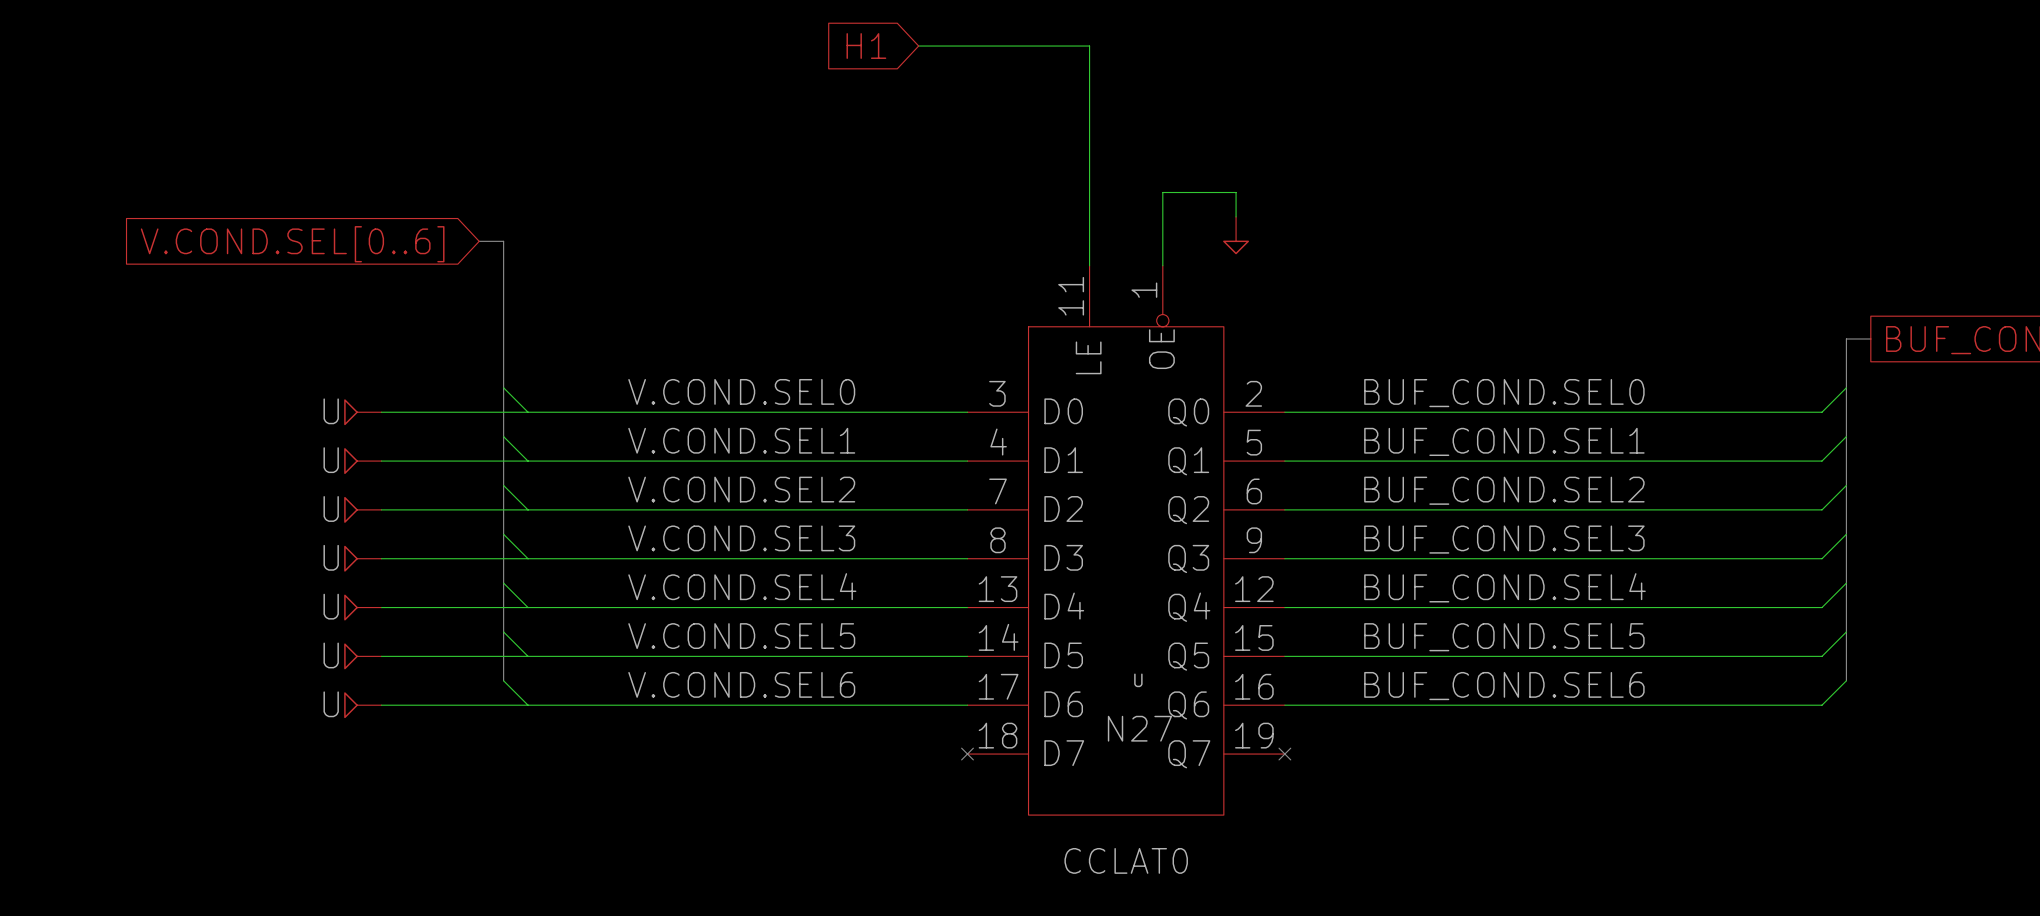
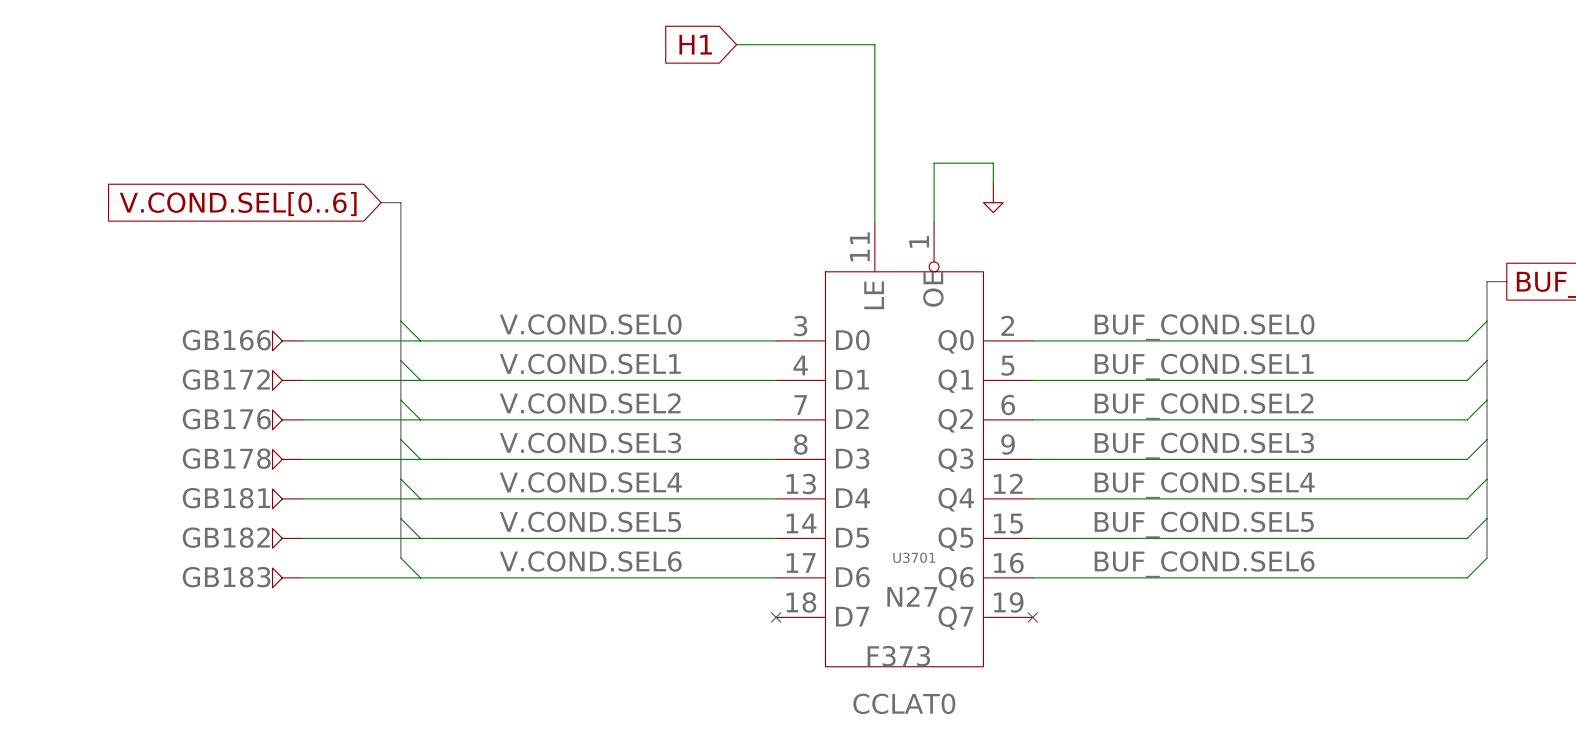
U name: U (331, 411) -> GB166 (226, 340)
U name: U (331, 460) -> GB172 (226, 379)
U name: U (331, 508) -> GB176 (226, 419)
U name: U (331, 557) -> GB178 (226, 458)
U name: U (331, 606) -> GB181 (226, 498)
U name: U (331, 655) -> GB182 (226, 537)
U name: U (1138, 680) -> U3701 (914, 557)
U name: U (331, 704) -> GB183 (226, 577)
U value: none -> F373 (898, 656)

